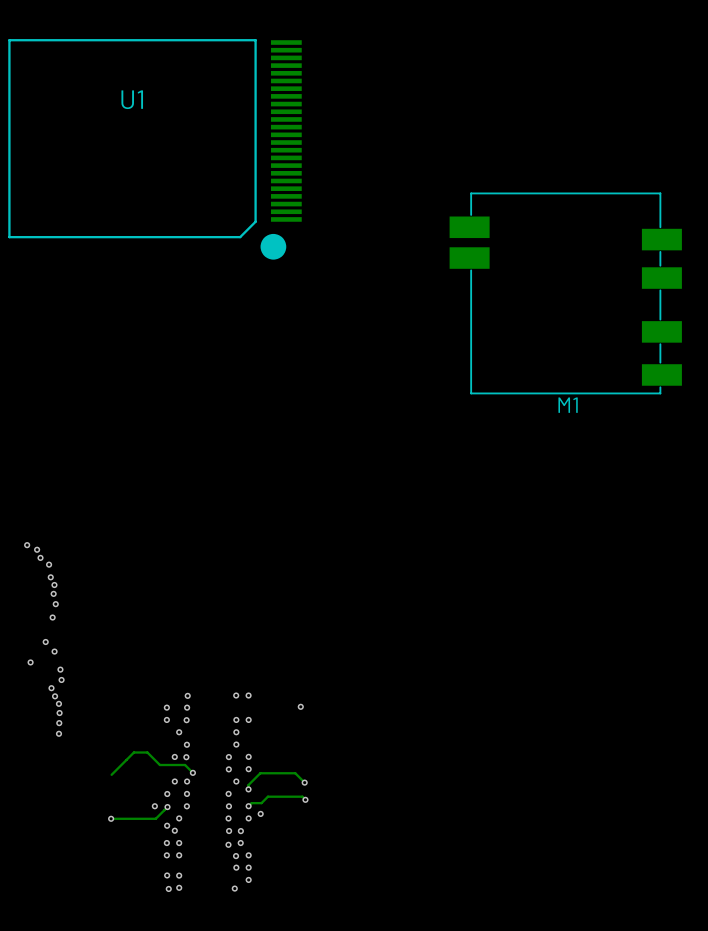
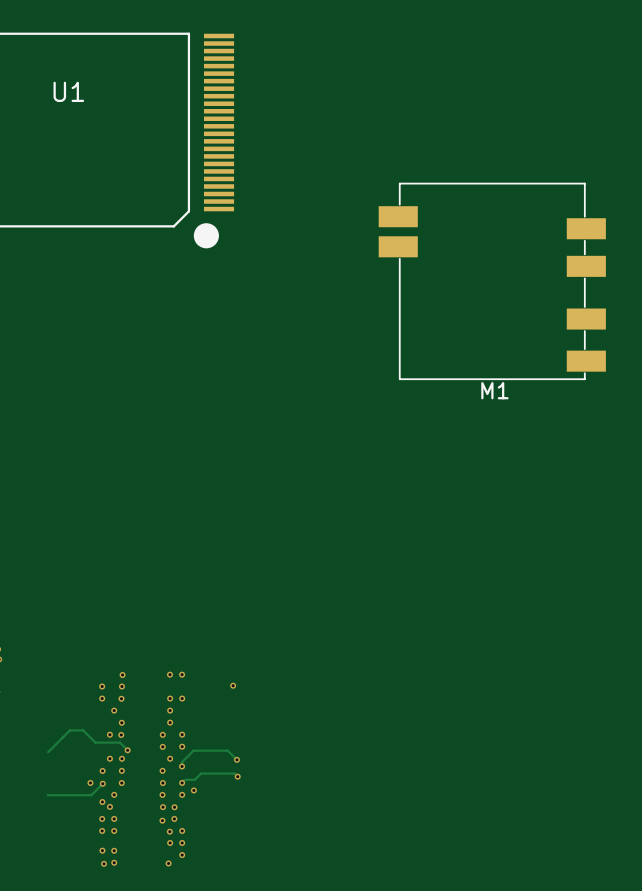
via: (111, 818) -> none

